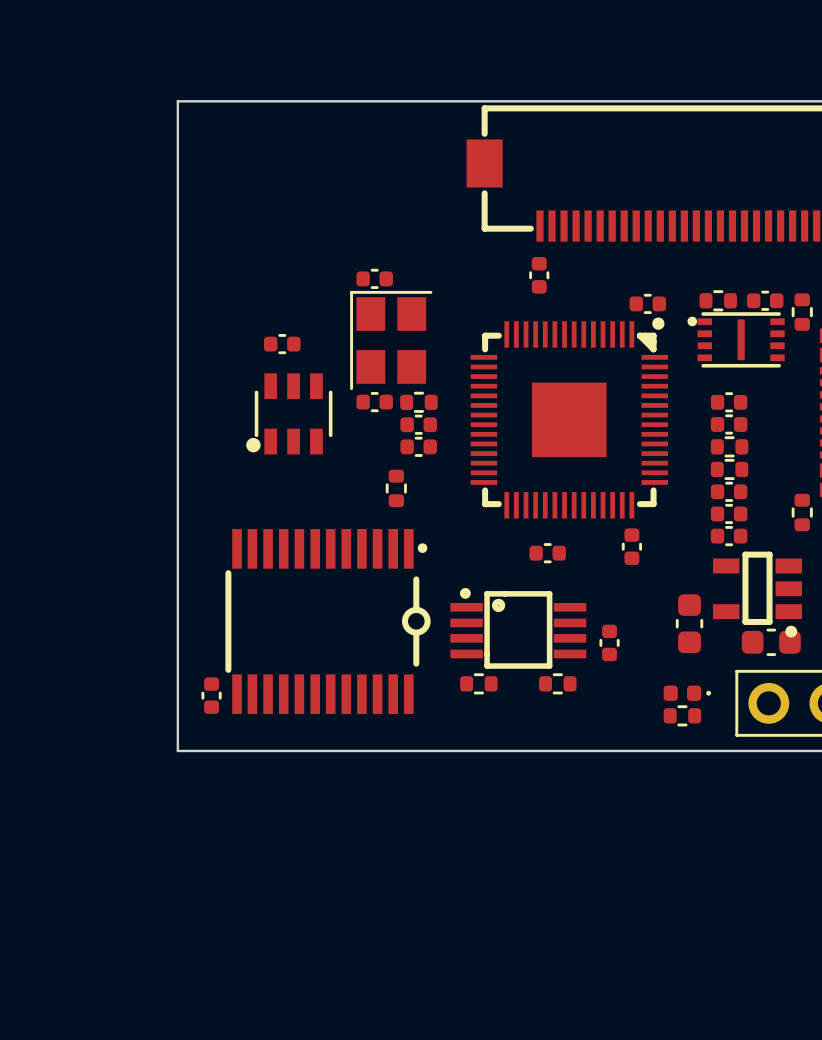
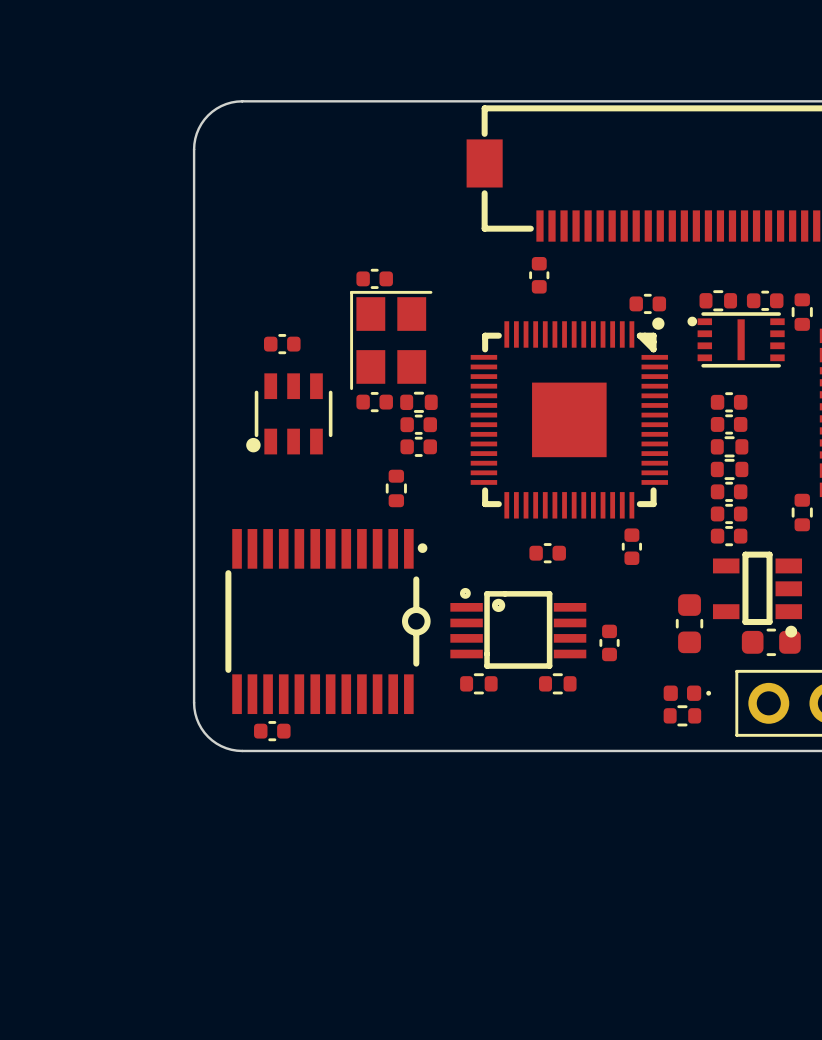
board edge: (242, 101) (177, 101) (177, 750) (242, 750) -> (242, 101) (221, 106) (208, 115) (198, 128) (194, 149) (194, 708) (201, 728) (212, 740) (226, 748) (242, 750)
part rotation: 0° (211, 695) -> 90° clockwise (272, 731)
part position: (211, 695) -> (272, 731)

